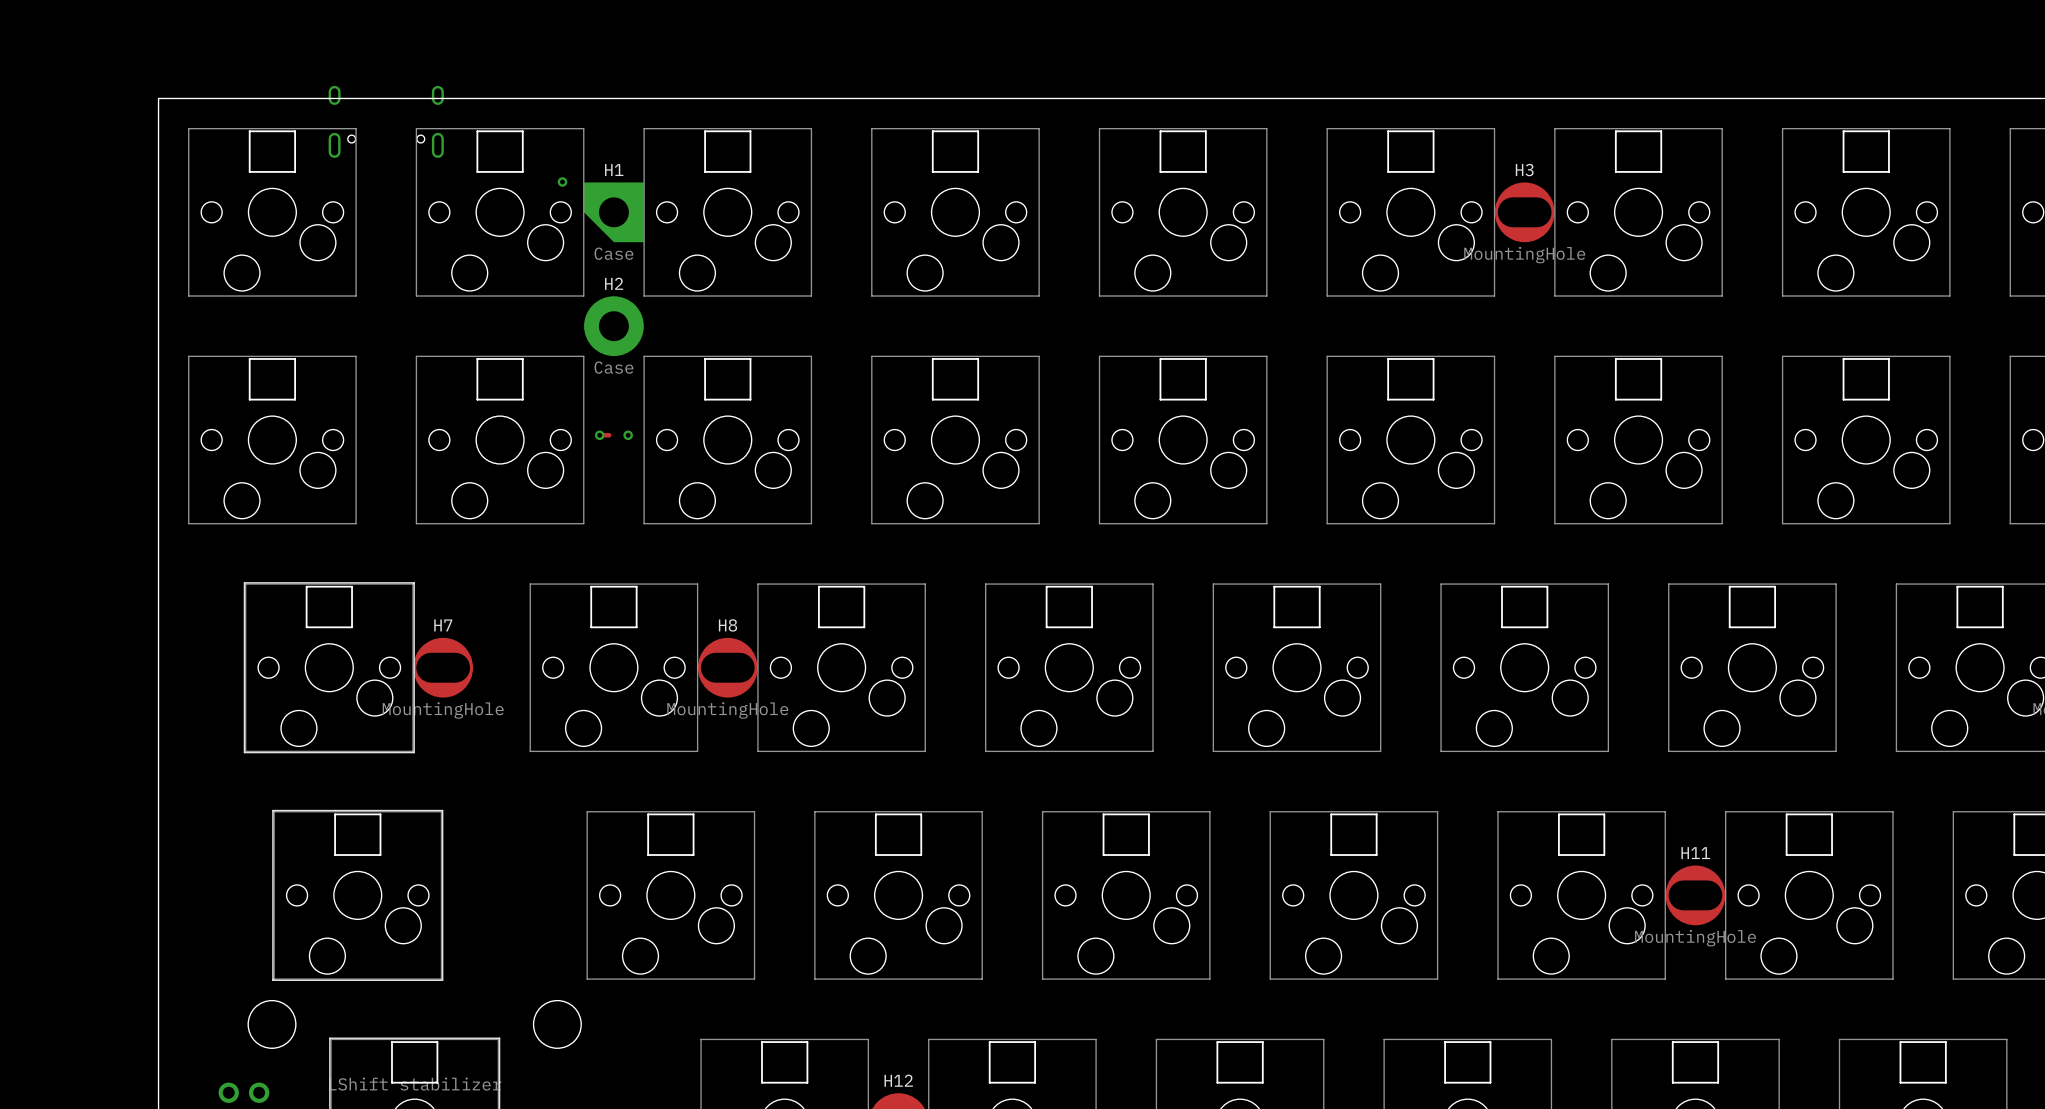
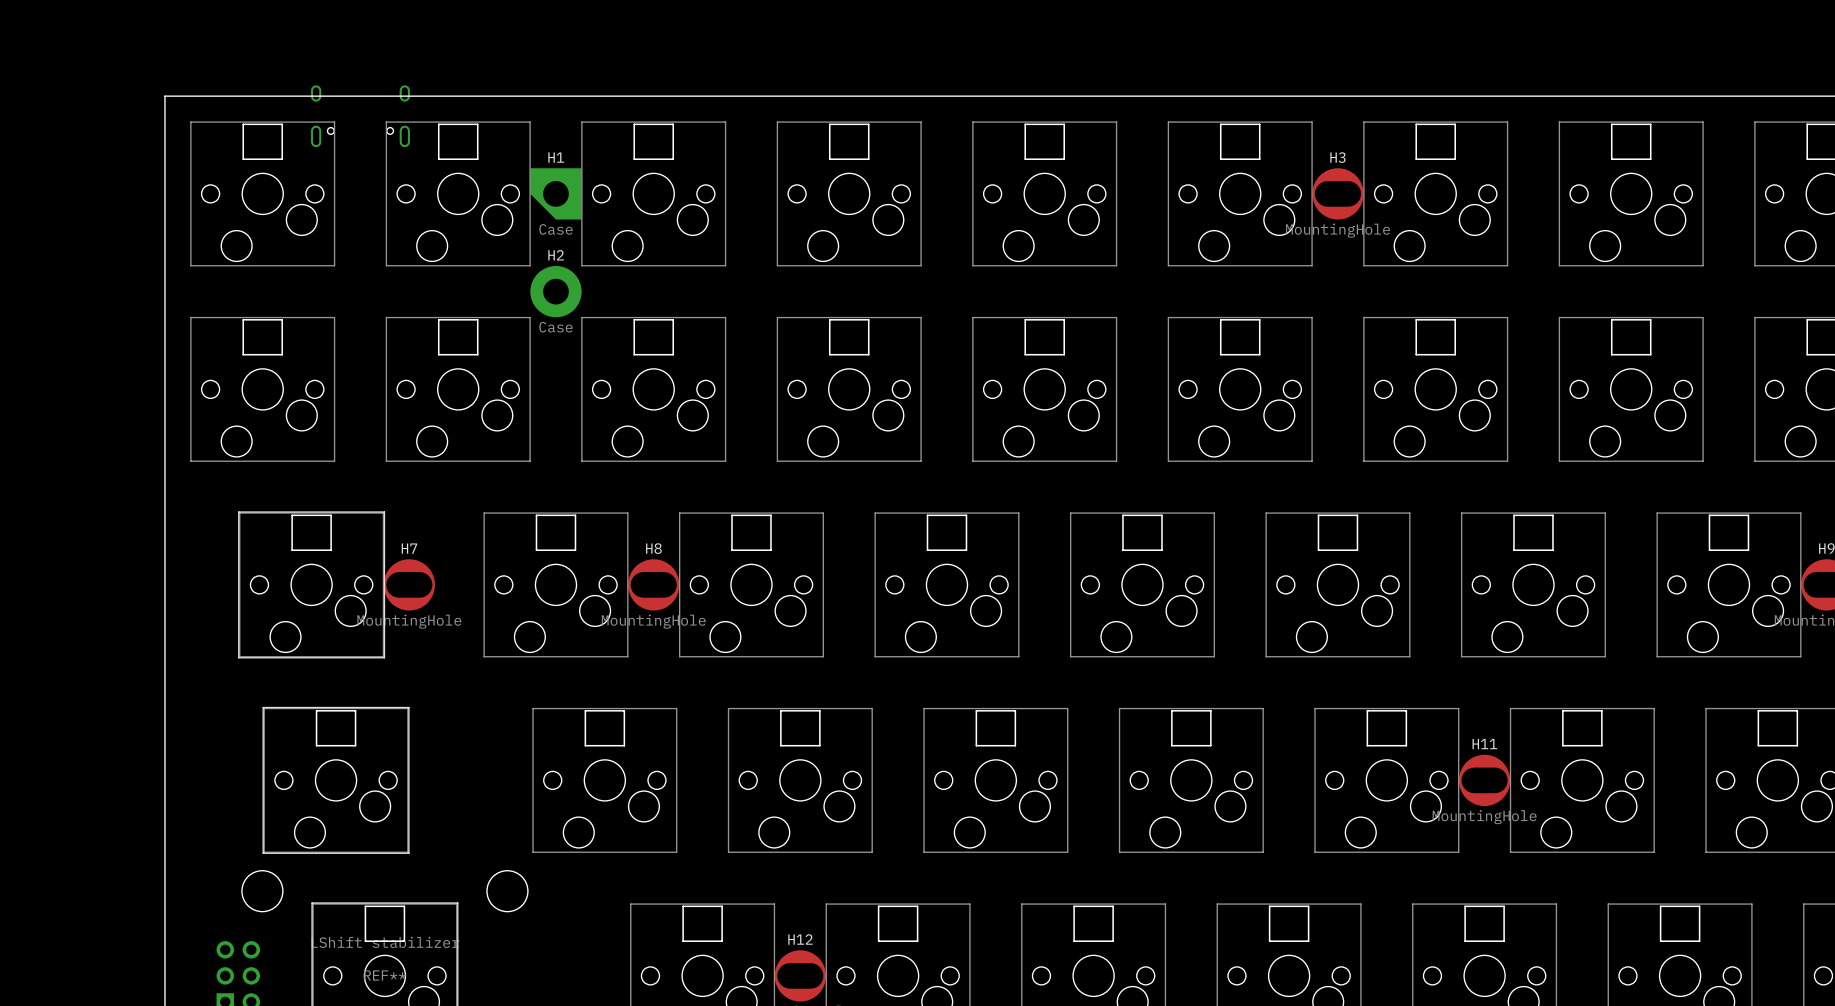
via: (562, 181) -> none
track: (599, 435) (609, 435) -> none
via: (599, 435) -> none
via: (628, 435) -> none

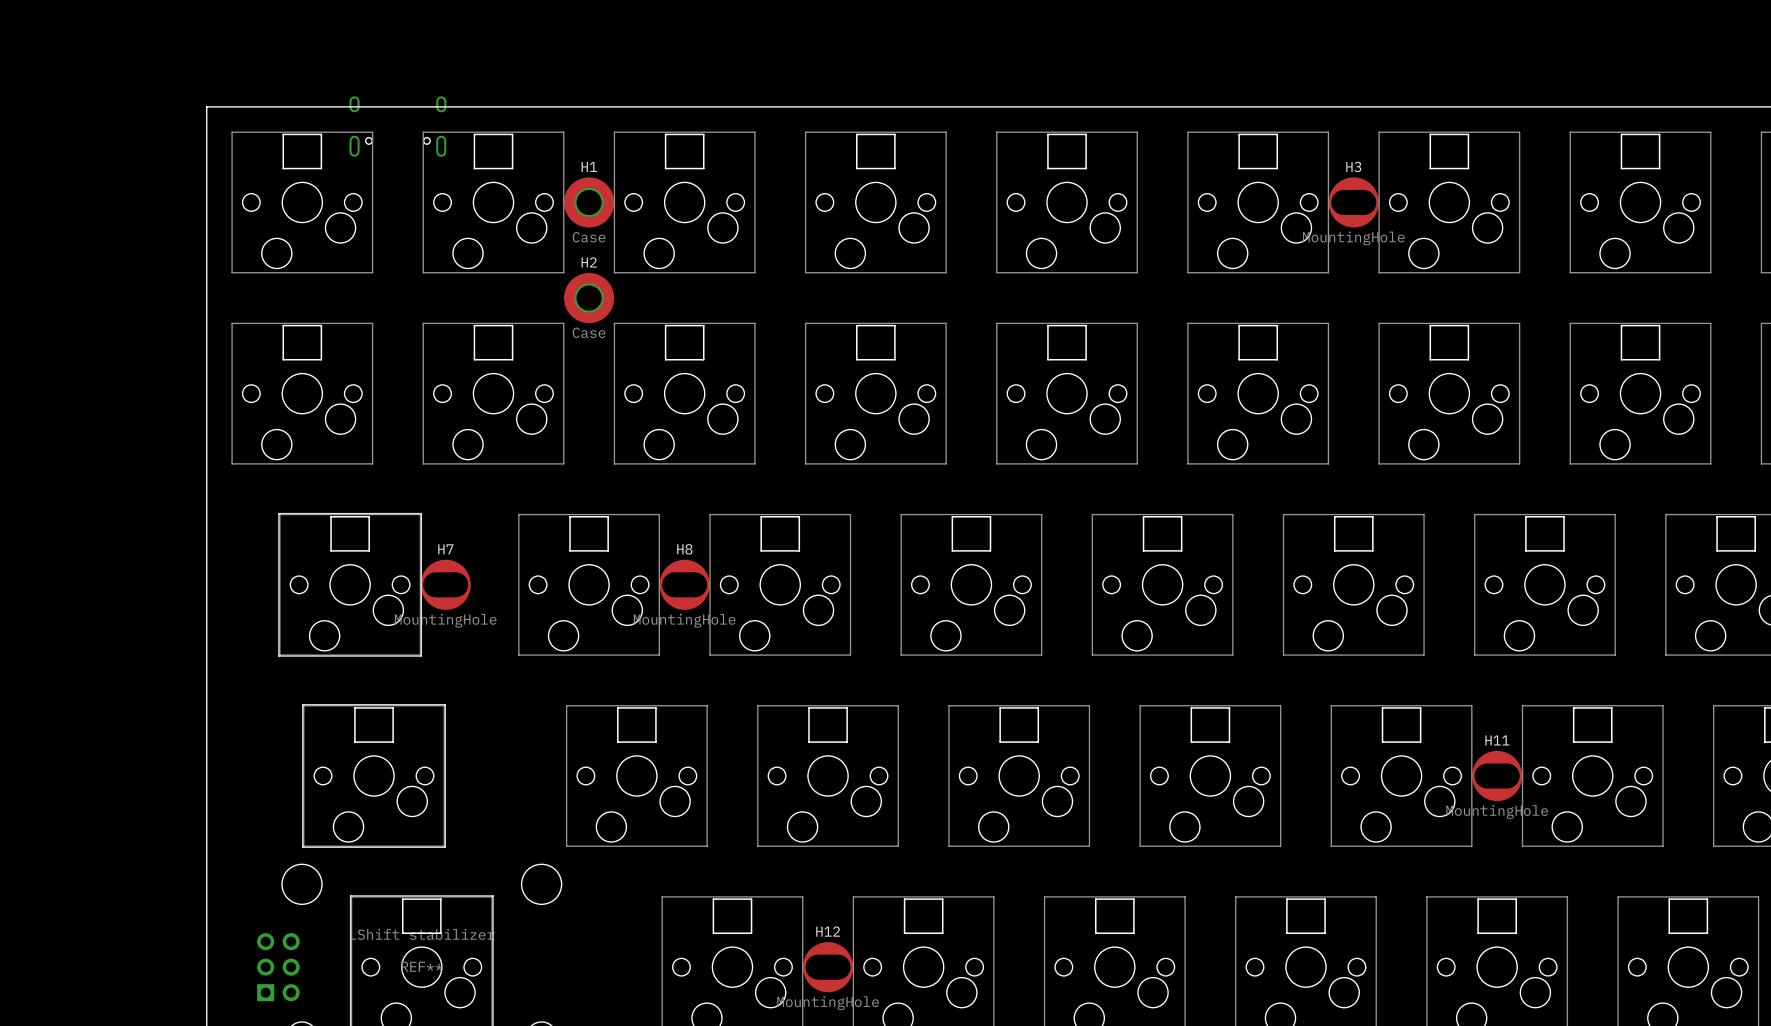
H1 footprint: [530, 168, 582, 220] -> [564, 177, 615, 228]
H2 footprint: [530, 265, 582, 318] -> [564, 272, 615, 324]

